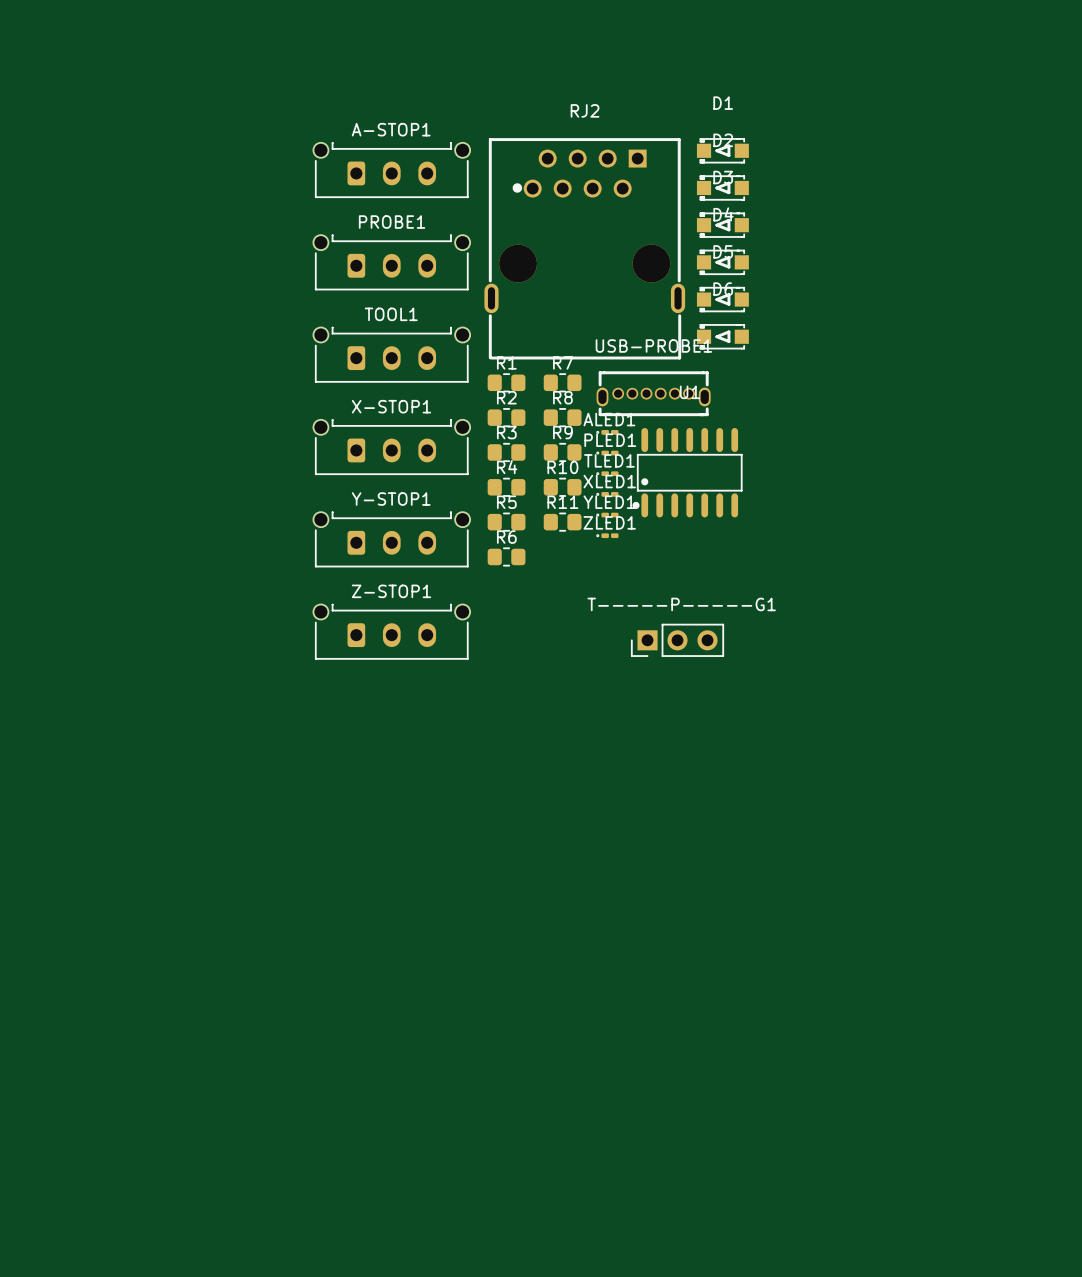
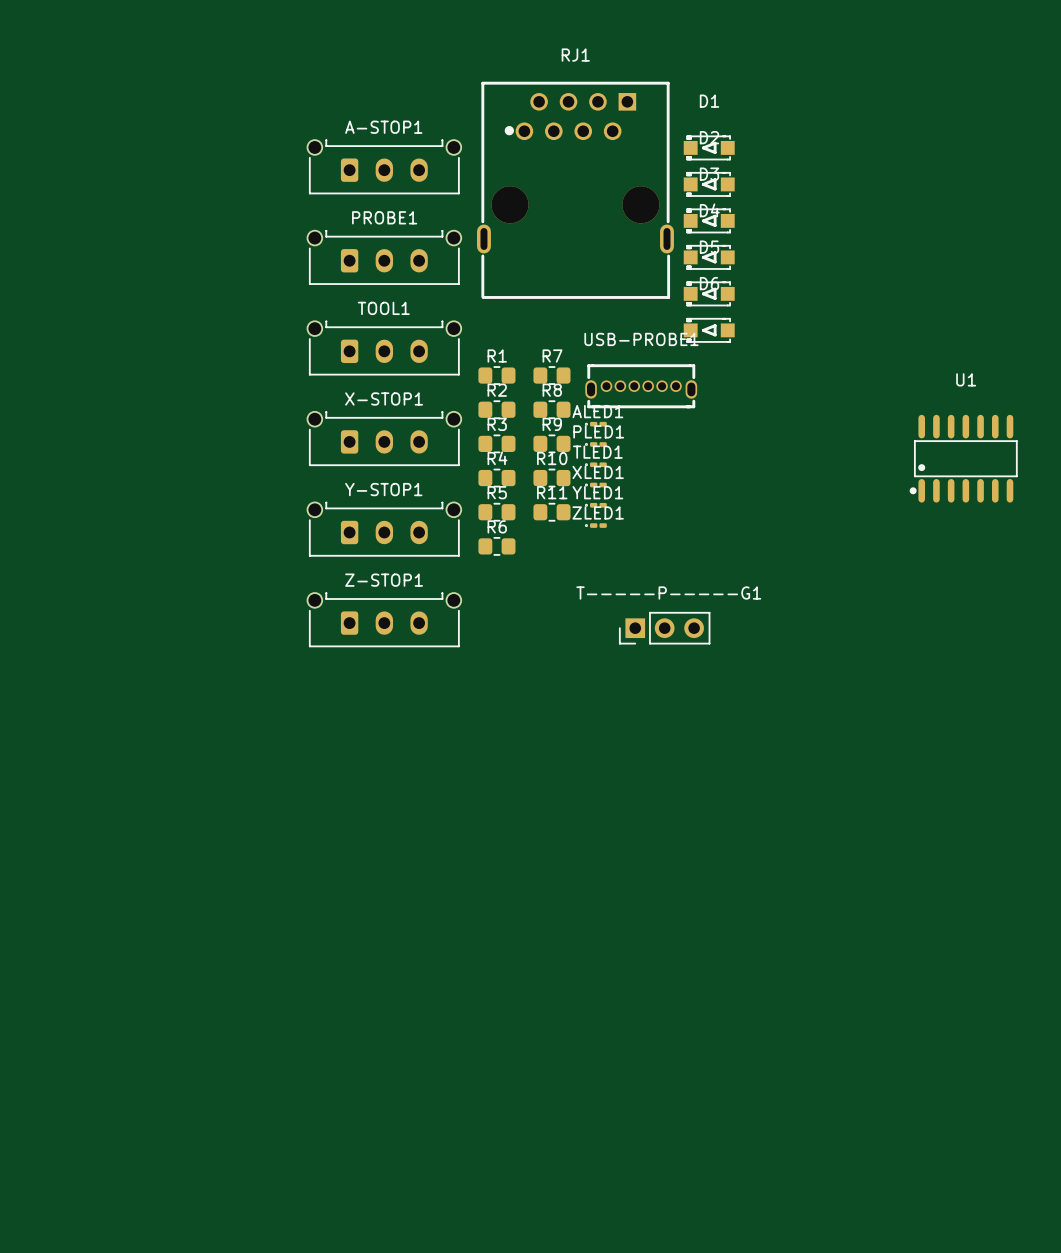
RJ1: none -> (575, 190)
RJ2: (584, 248) -> none
U1 position: (687, 472) -> (963, 458)

